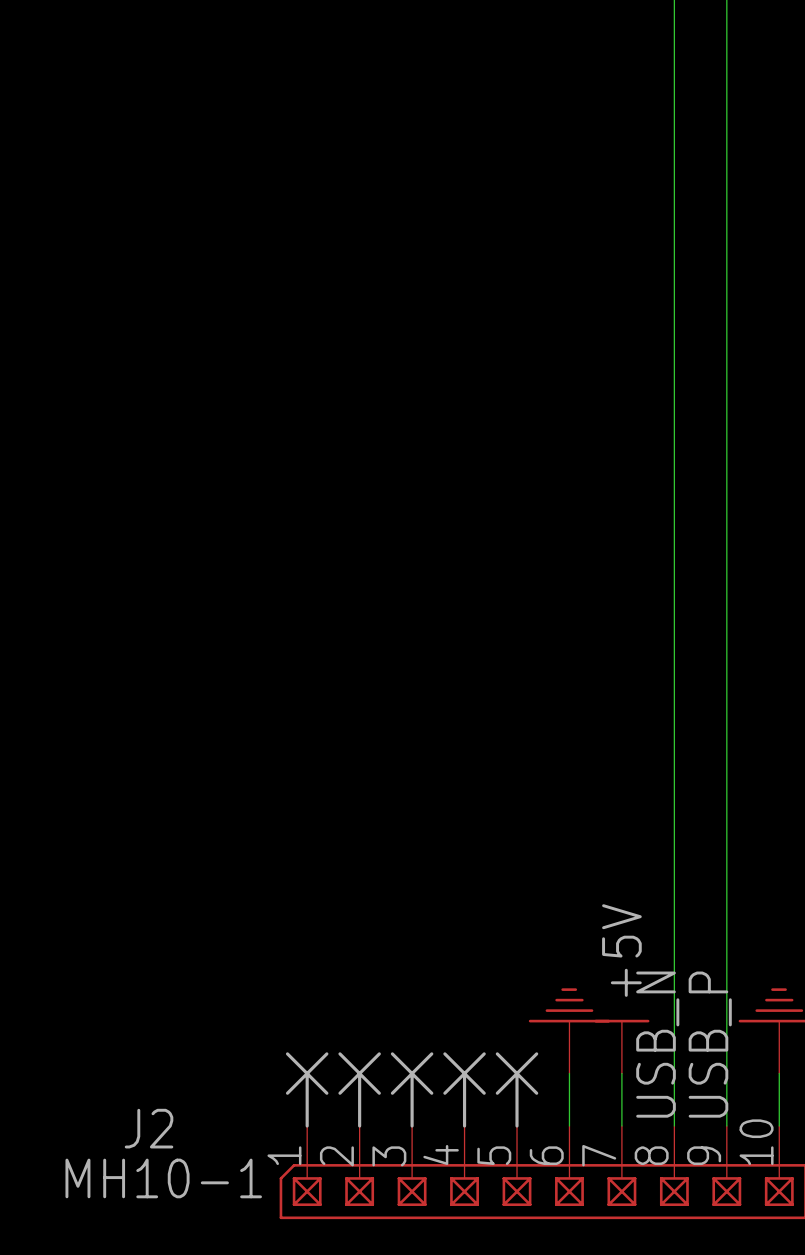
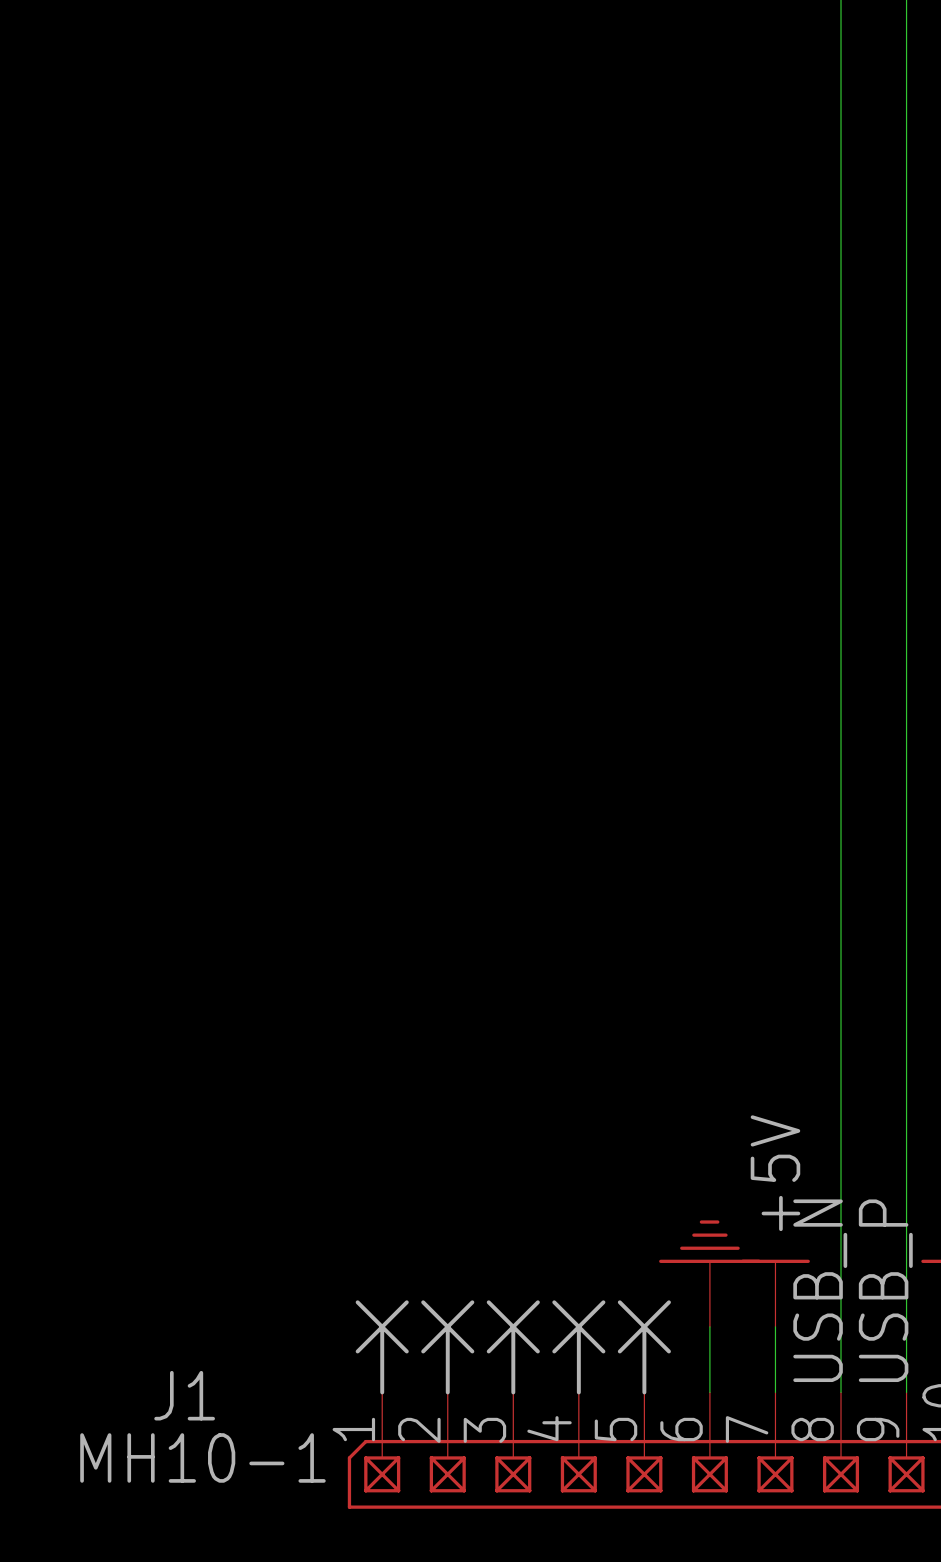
J2 name: J2 (149, 1128) -> J1 (184, 1395)

